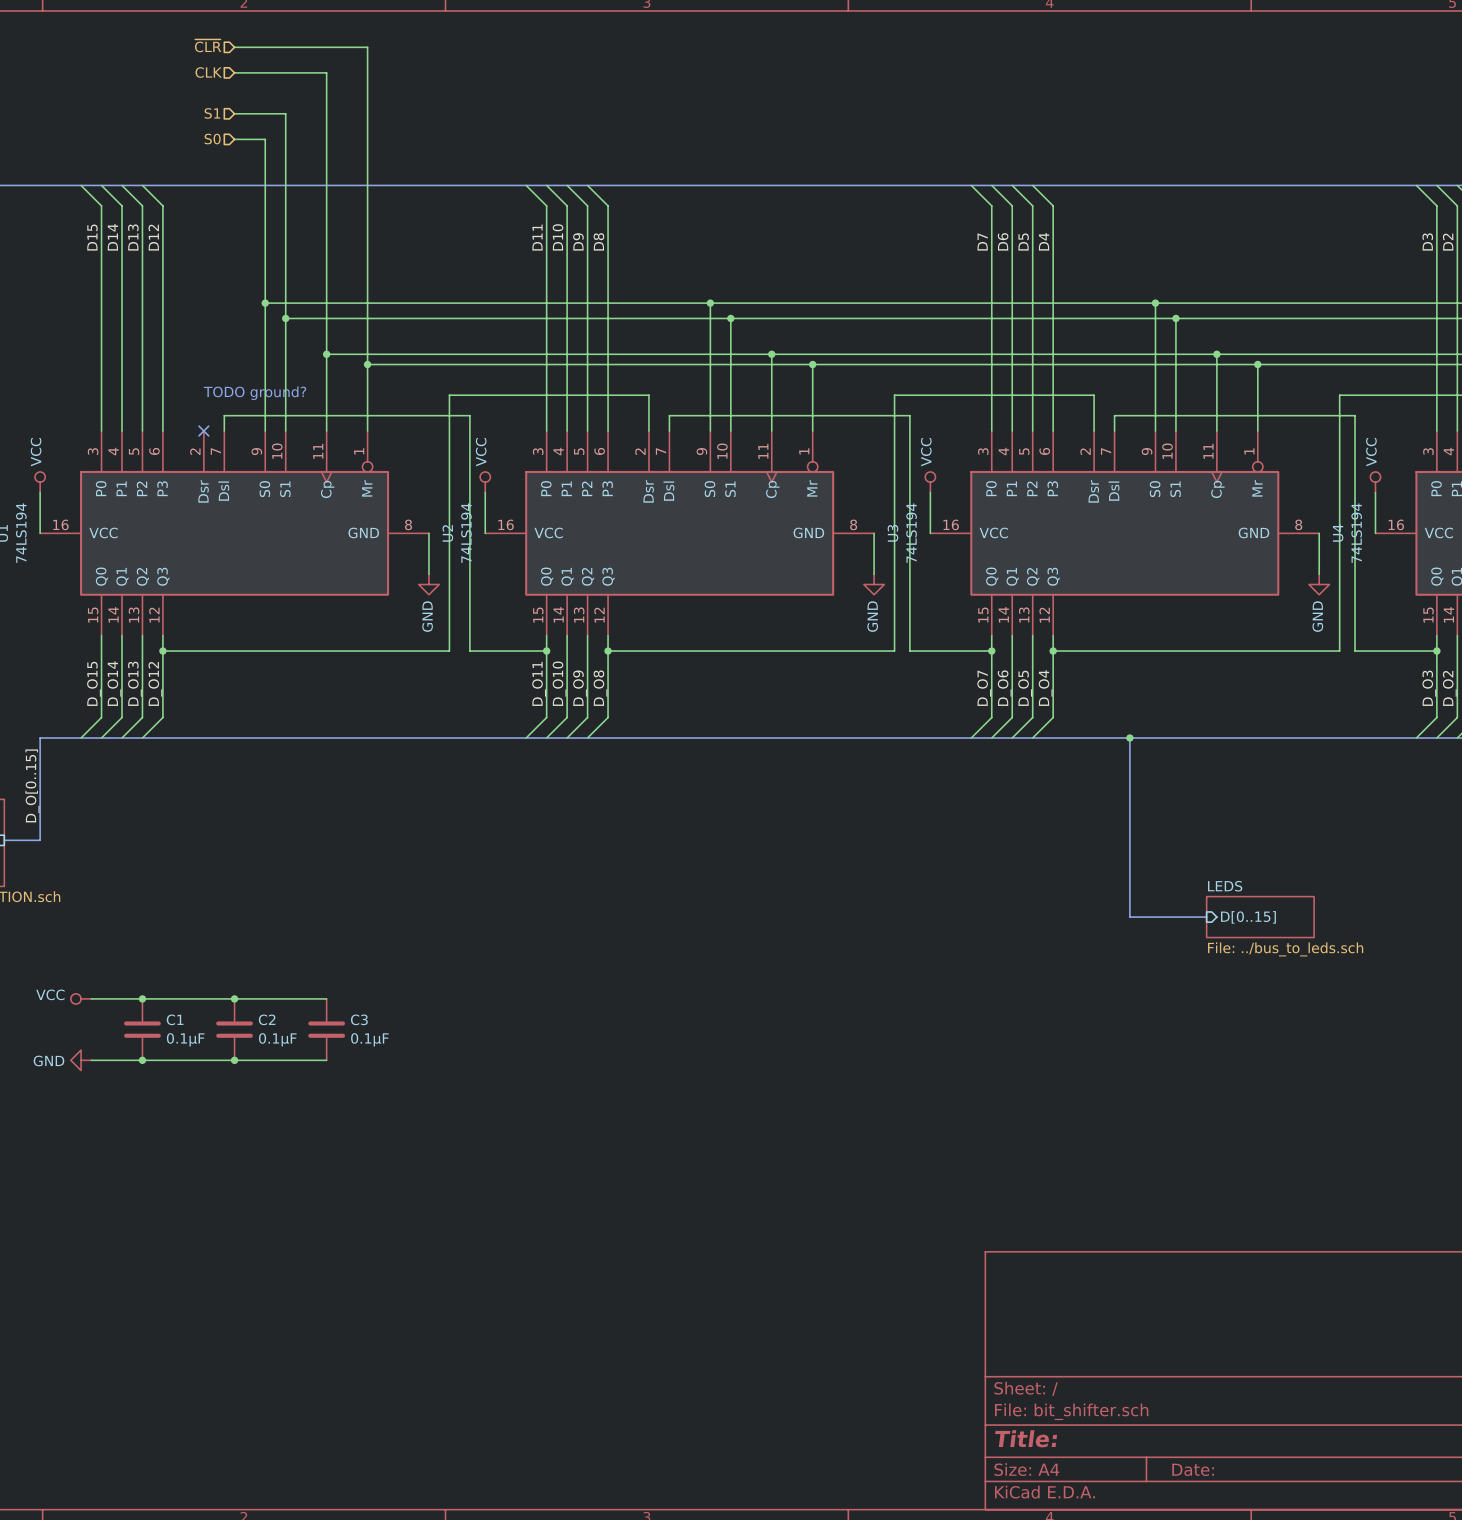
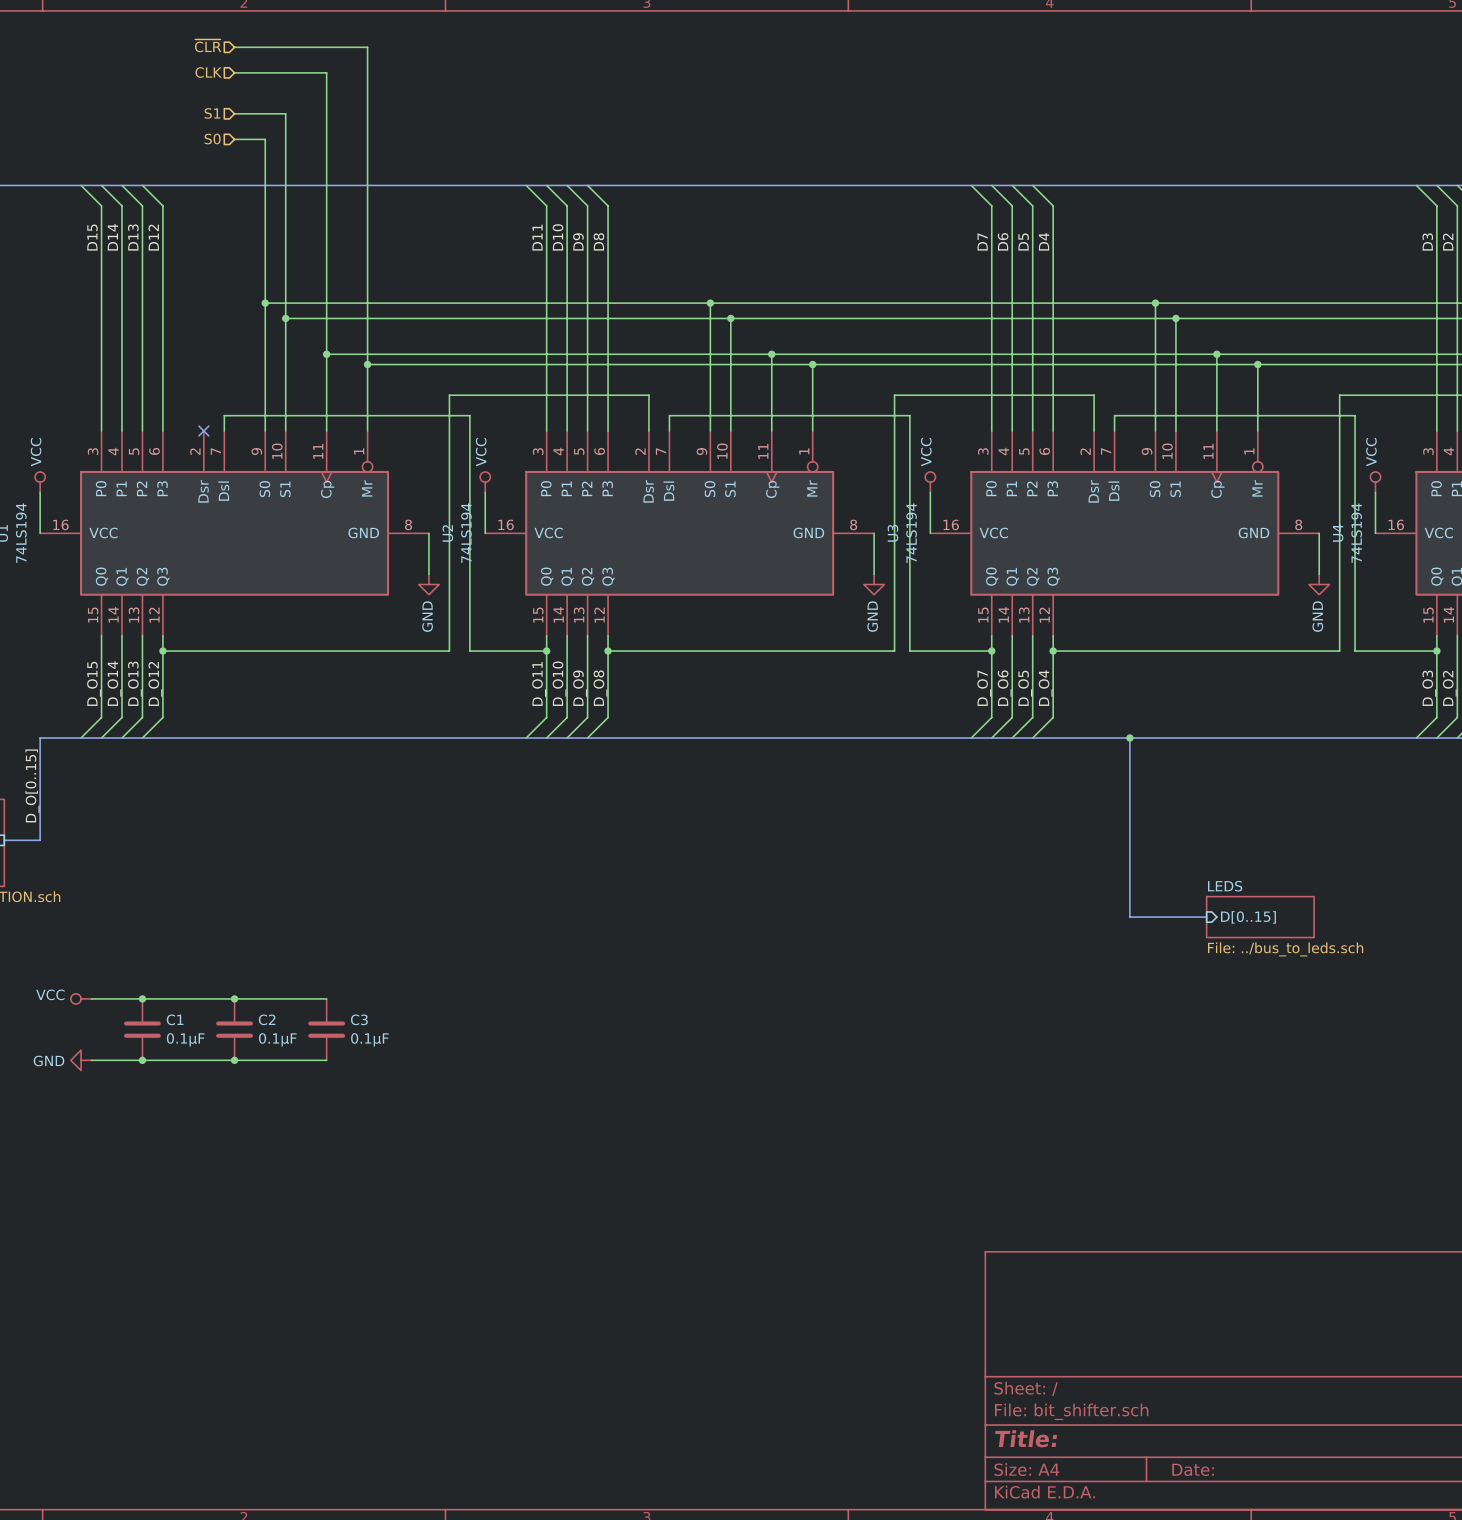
text: TODO ground? (255, 393) -> none

